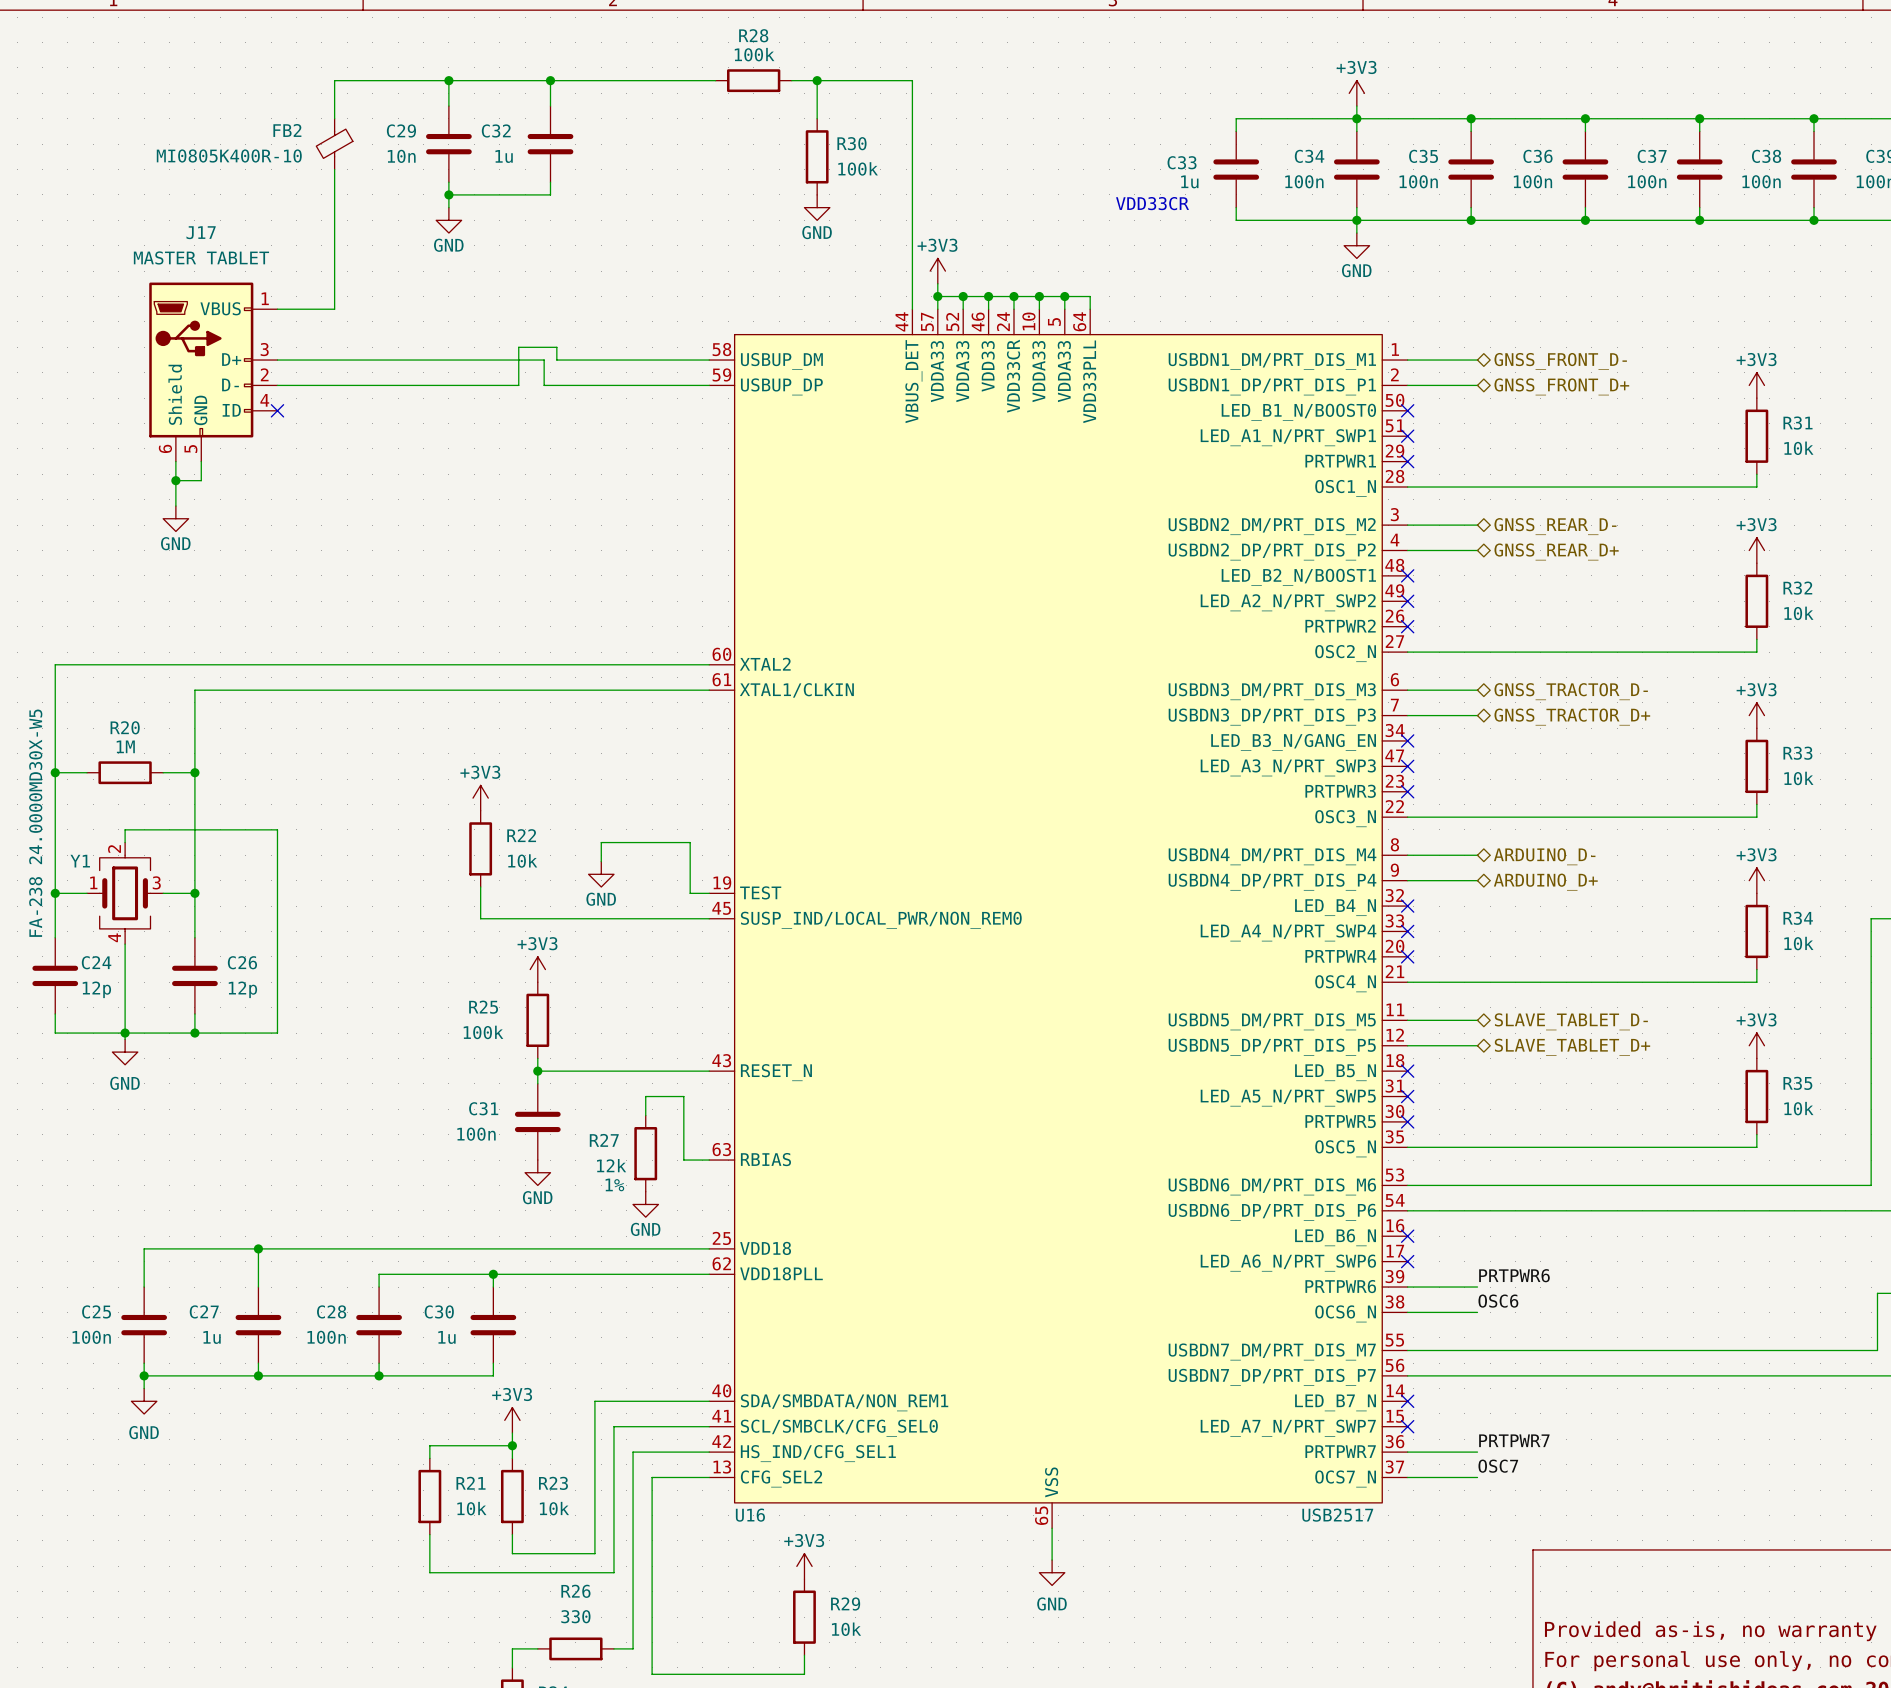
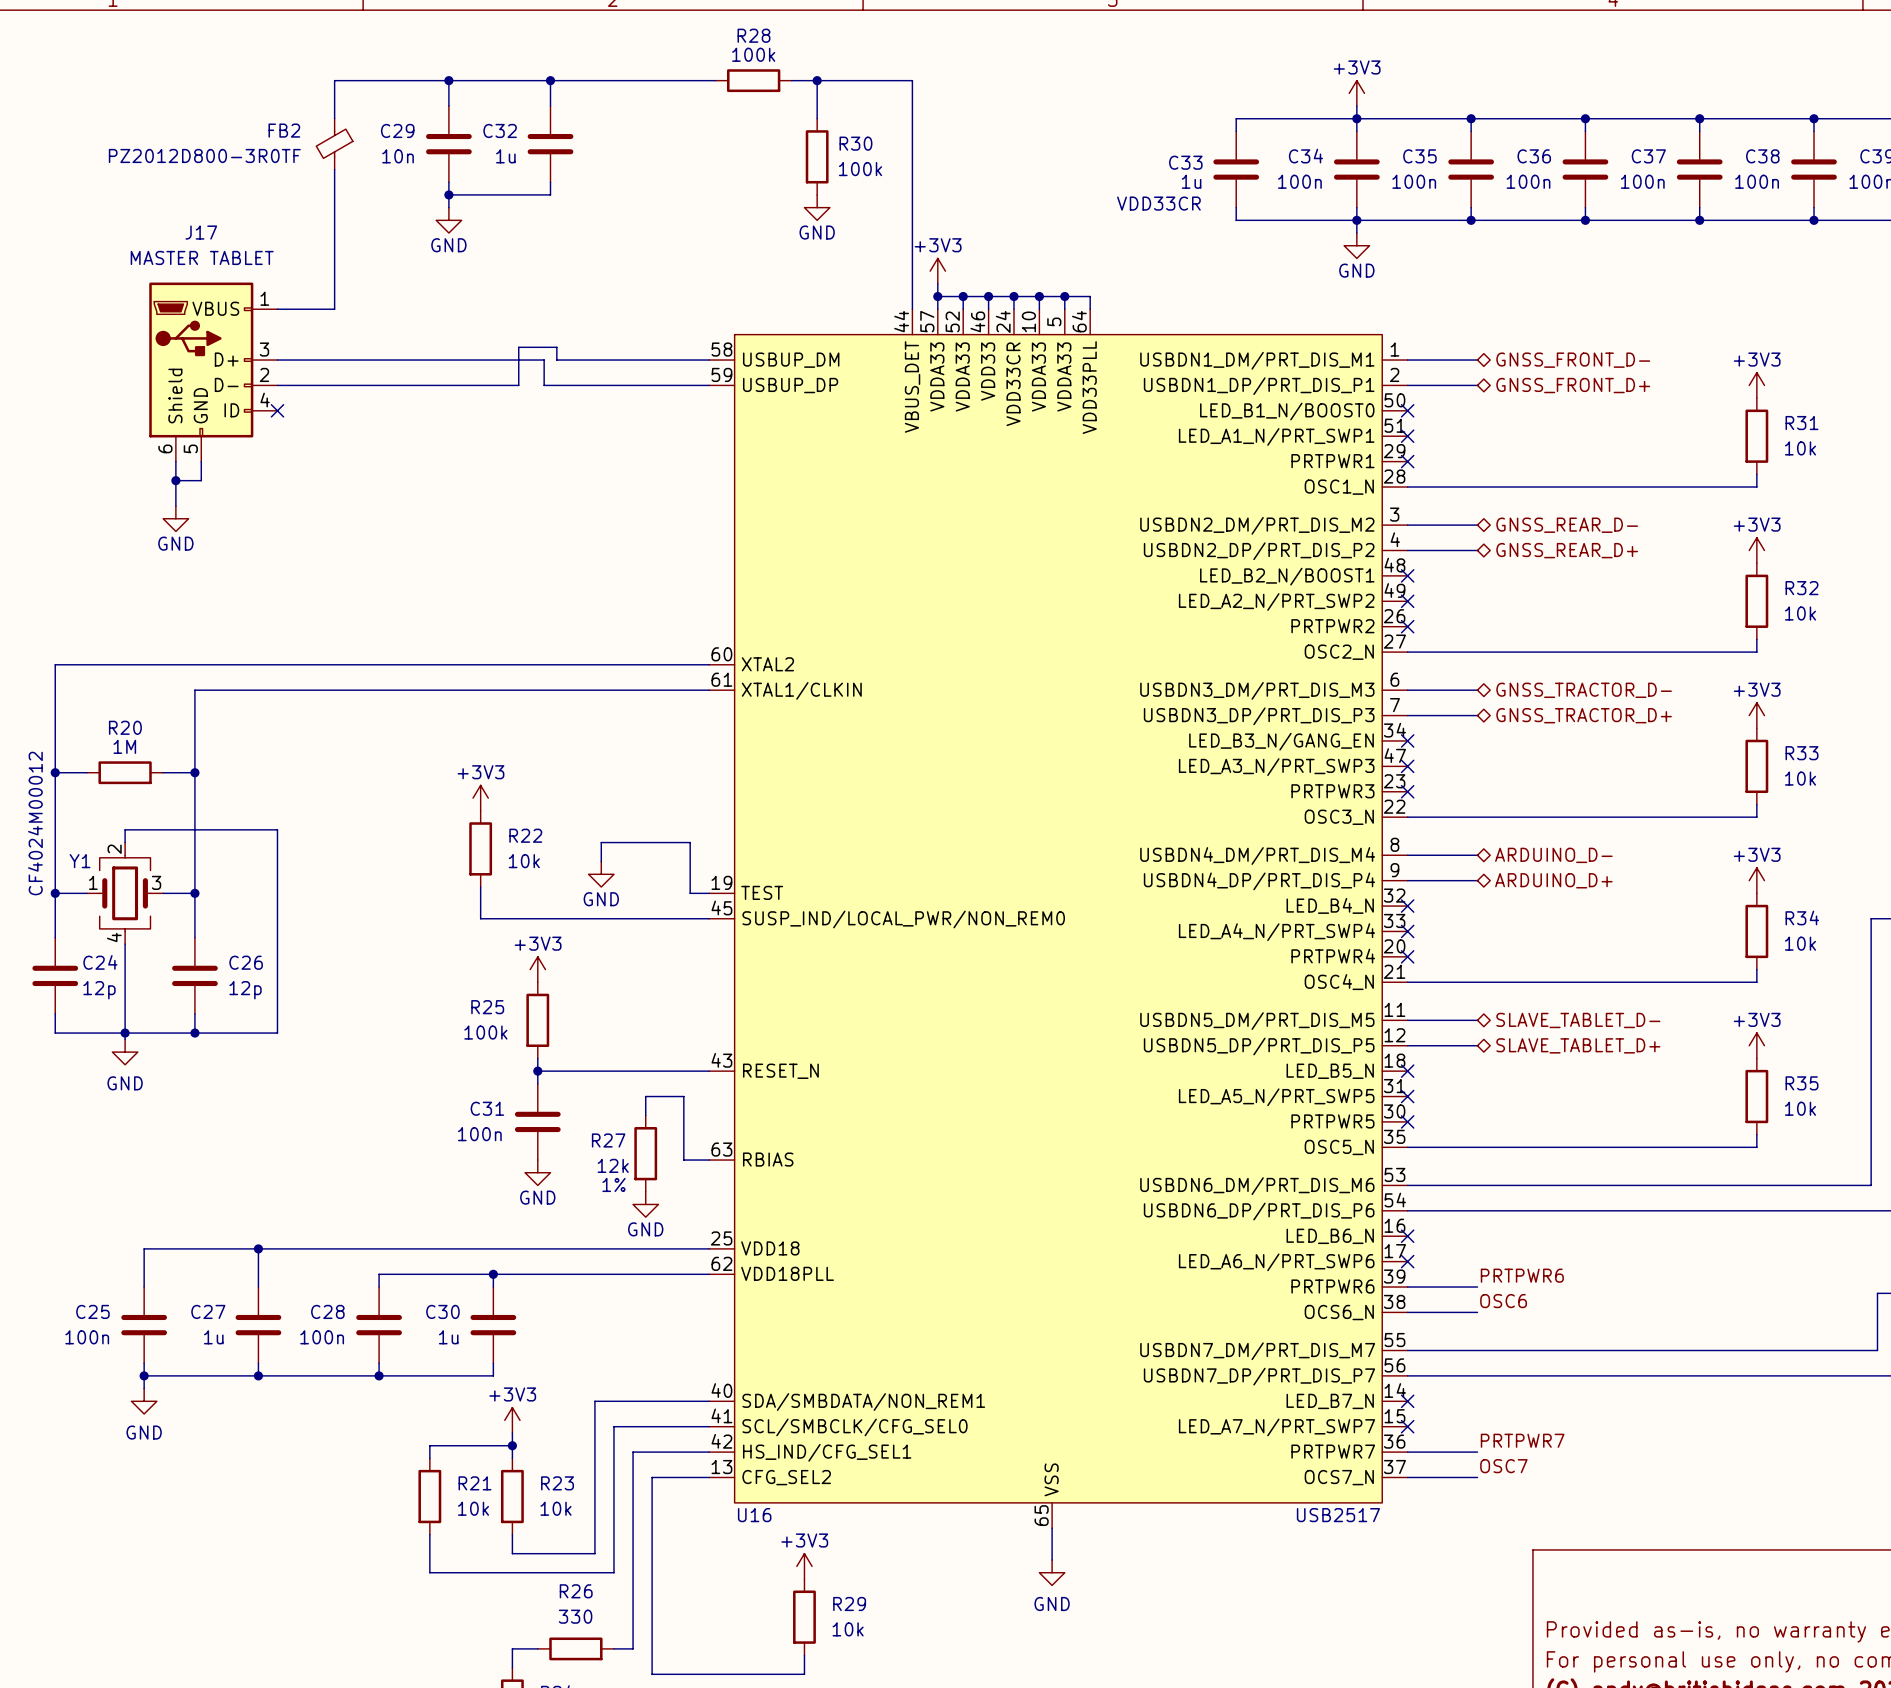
FB2 value: MI0805K400R-10 (229, 155) -> PZ2012D800-3R0TF (204, 155)
Y1 value: FA-238 24.0000MD30X-W5 (35, 823) -> CF4024M00012 (35, 823)

